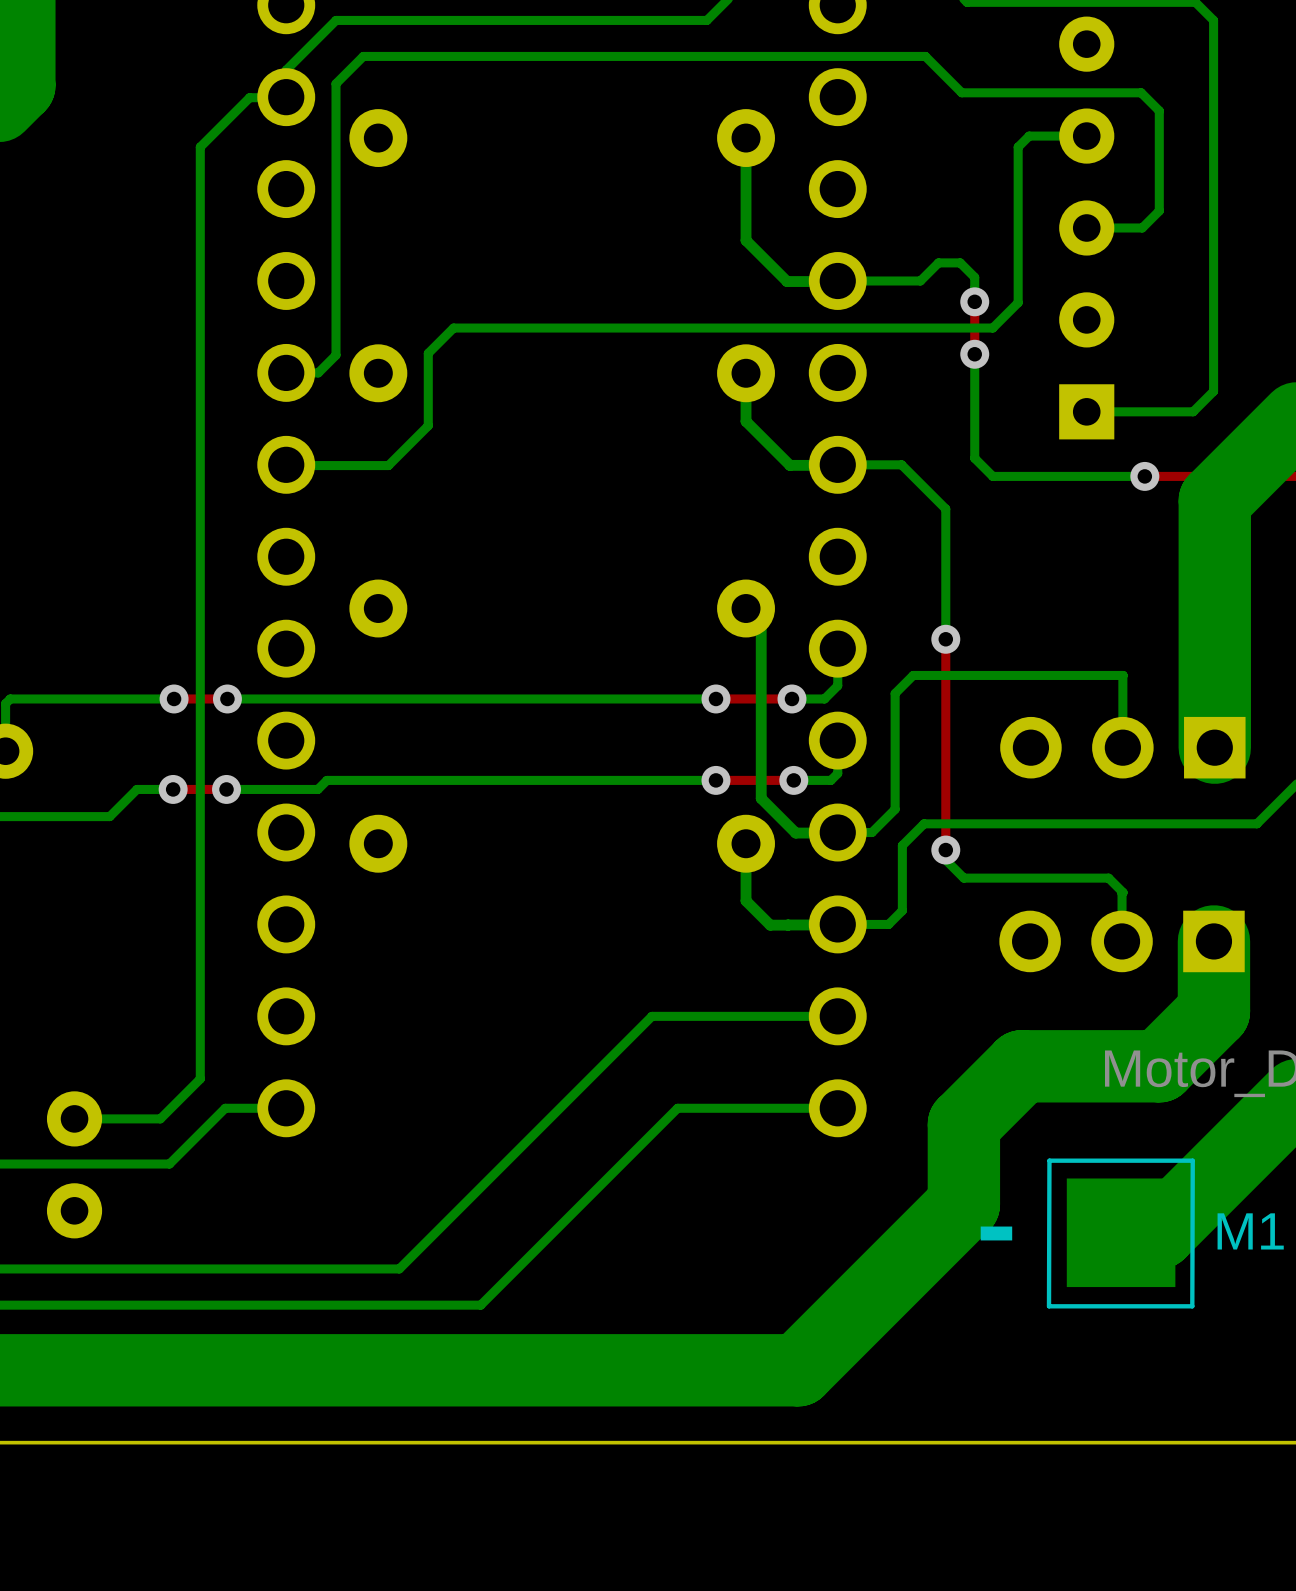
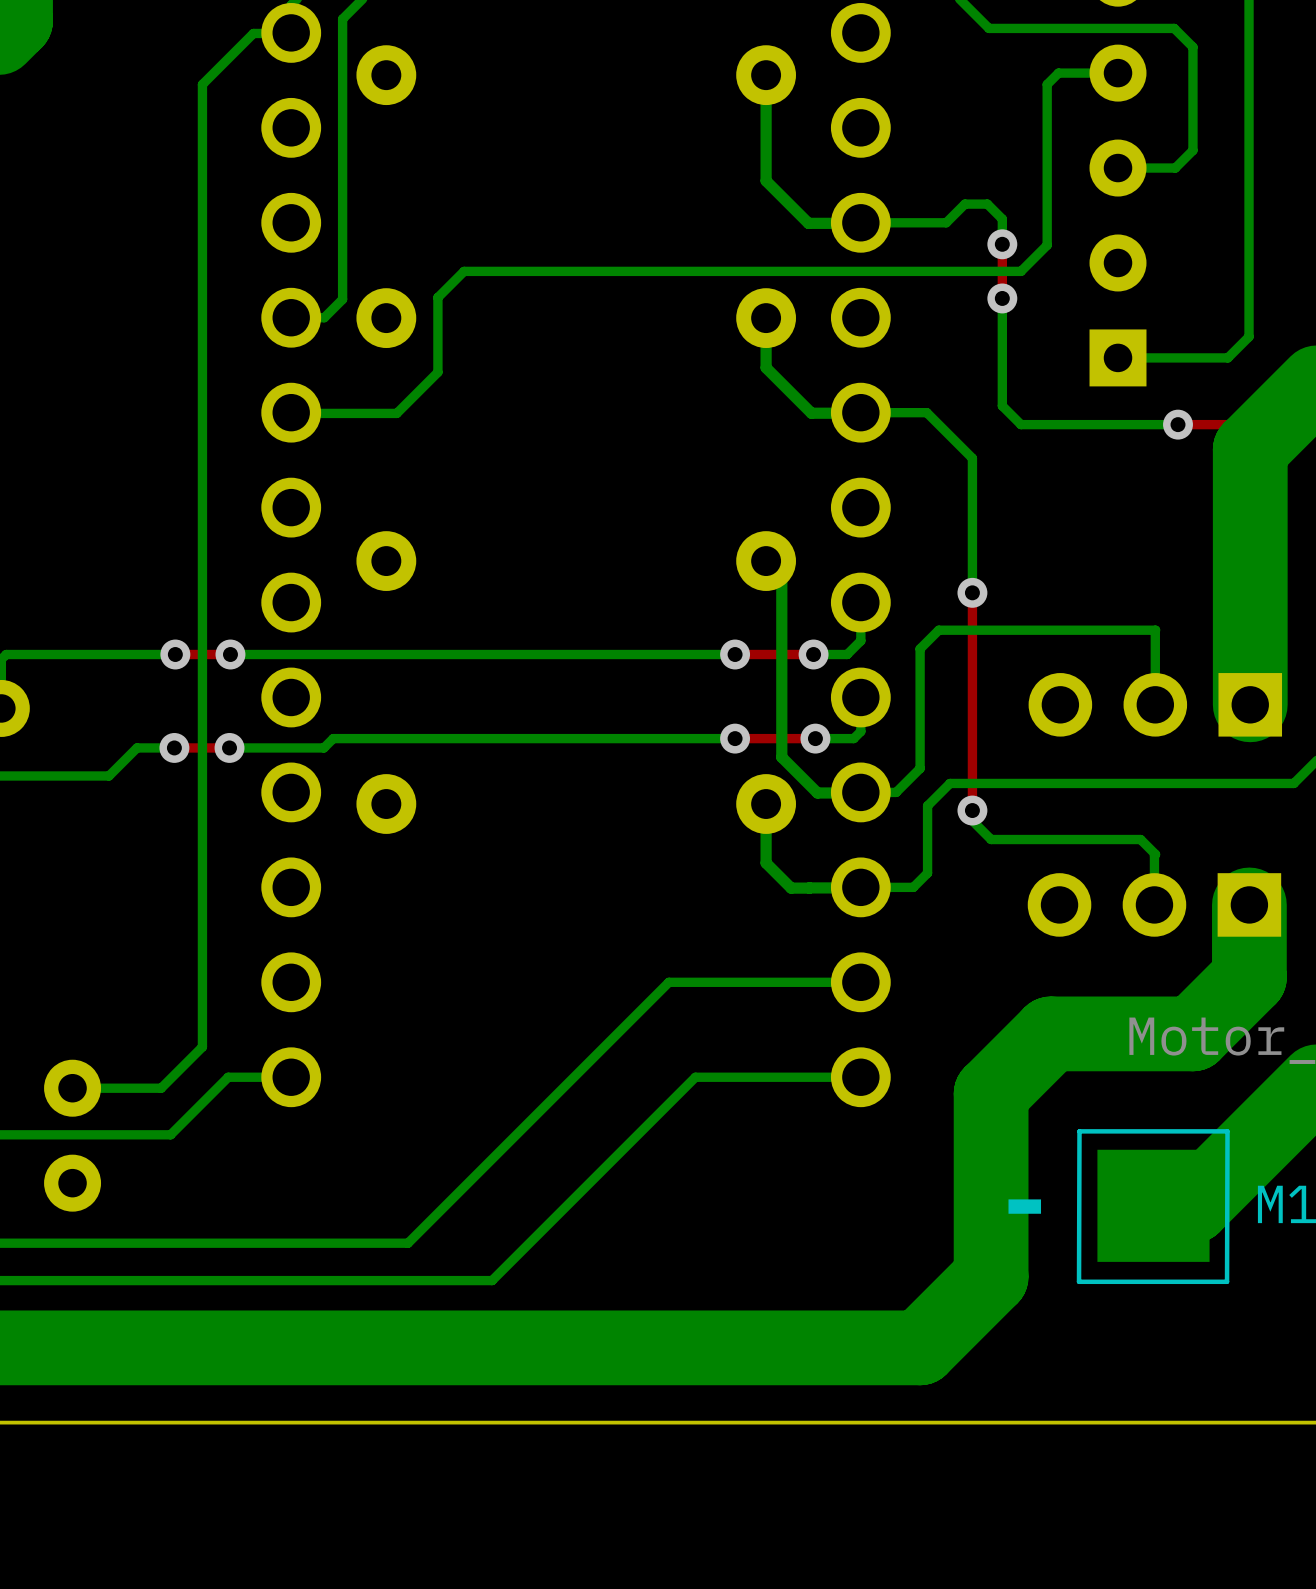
bottom track: (963, 1204) (798, 1370) -> (991, 1176) (991, 1276) (920, 1347) (819, 1347)

